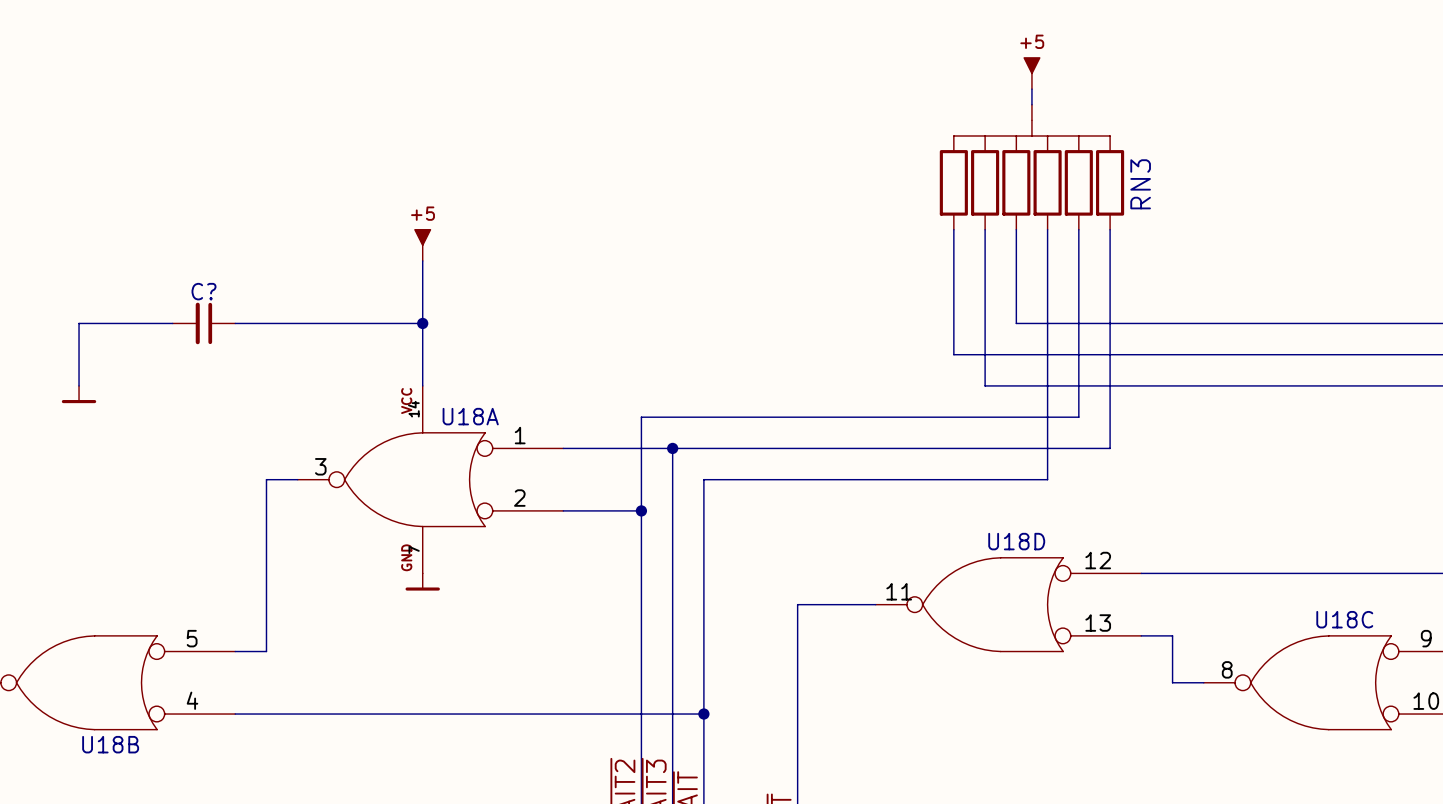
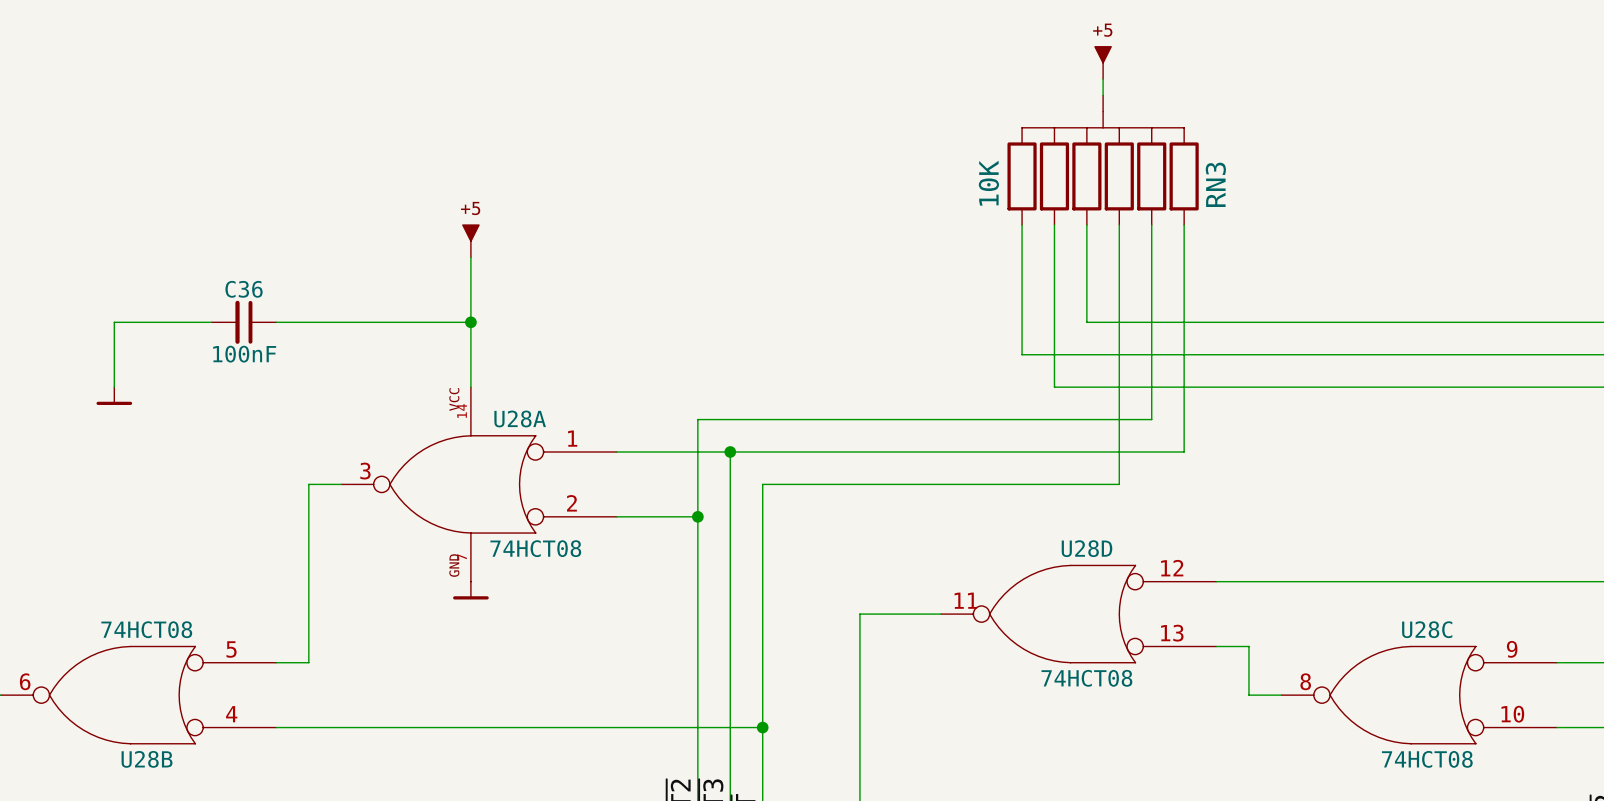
RN3 value: none -> 10K (988, 183)
C? name: C? (203, 291) -> C36 (244, 289)
C? value: none -> 100nF (244, 354)
U18A name: U18A (470, 416) -> U28A (520, 418)
U18A value: none -> 74HCT08 (535, 548)
U18D name: U18D (1016, 541) -> U28D (1086, 548)
U18B value: none -> 74HCT08 (146, 629)
U18C name: U18C (1344, 619) -> U28C (1427, 629)
U18D value: none -> 74HCT08 (1086, 678)
U18B name: U18B (110, 744) -> U28B (147, 759)
U18C value: none -> 74HCT08 (1427, 759)

